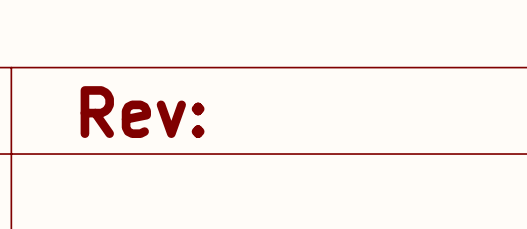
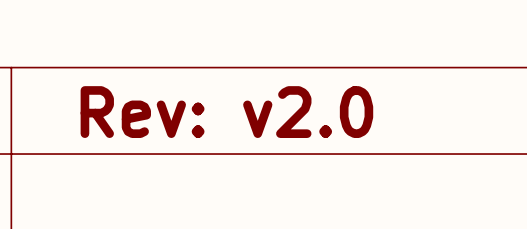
title block: Rev: (142, 112) -> Rev: v2.0 (226, 112)

